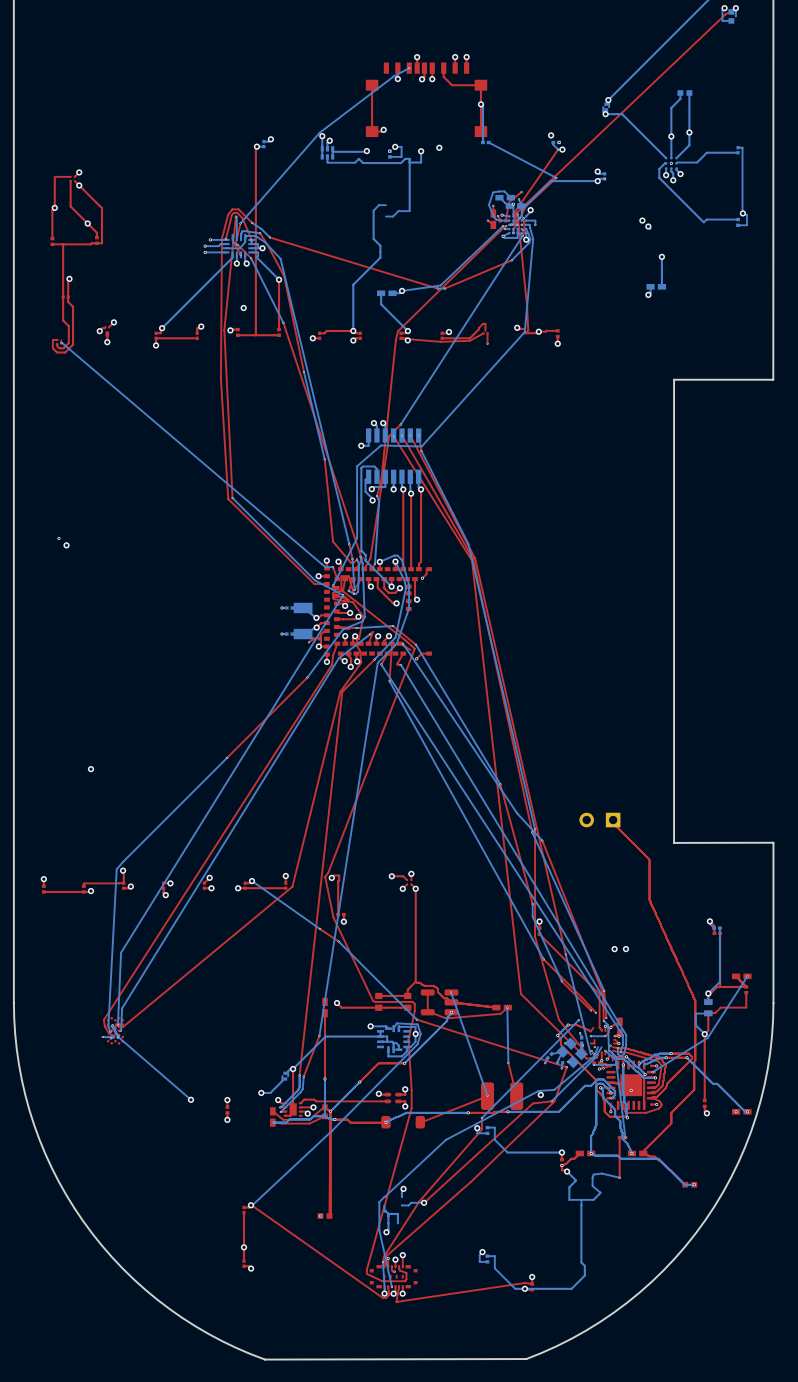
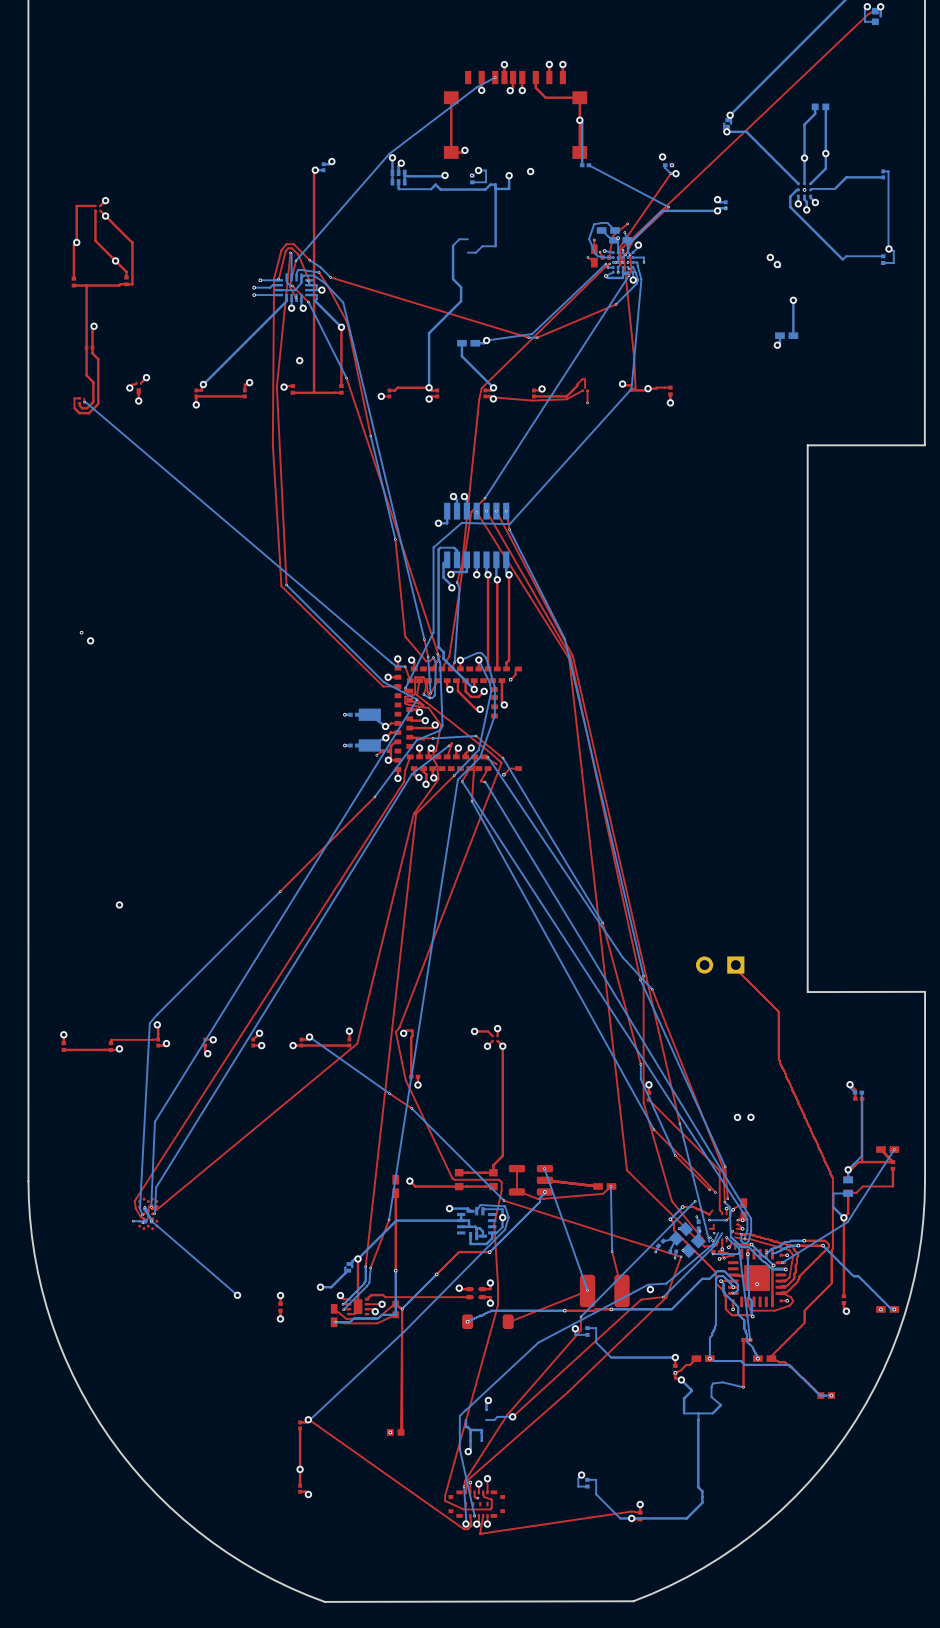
top track: (415, 981) (424, 985) (435, 986) (437, 992) (451, 1002) -> none
bottom track: (324, 1116) (334, 1119) -> none
top track: (334, 1119) (347, 1119) (350, 1122) (386, 1122) -> none
via: (334, 1119) -> none

